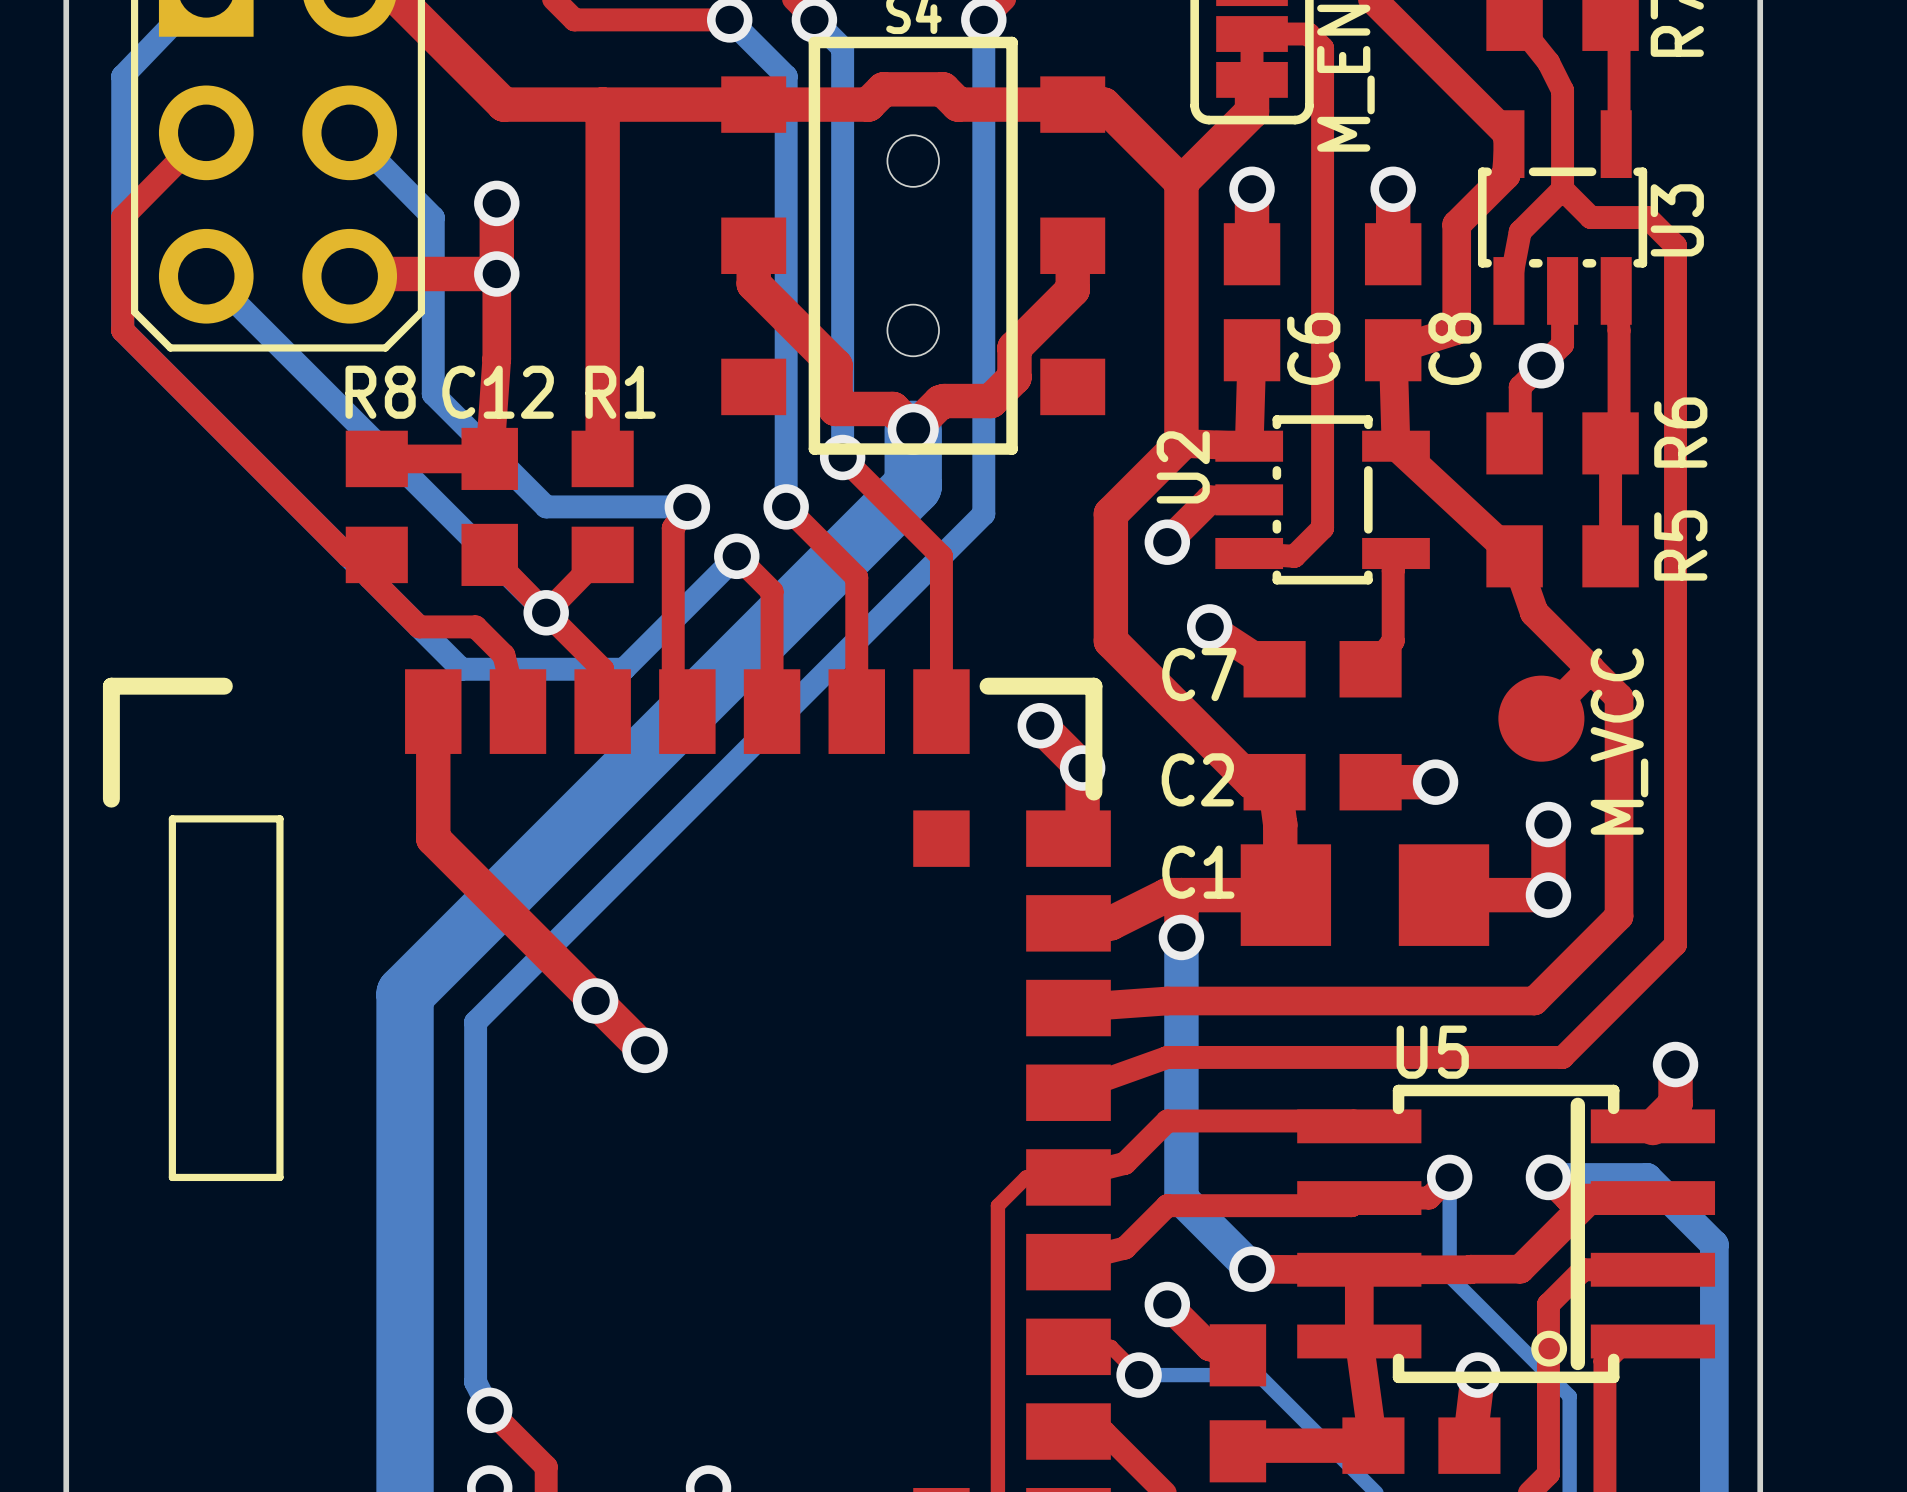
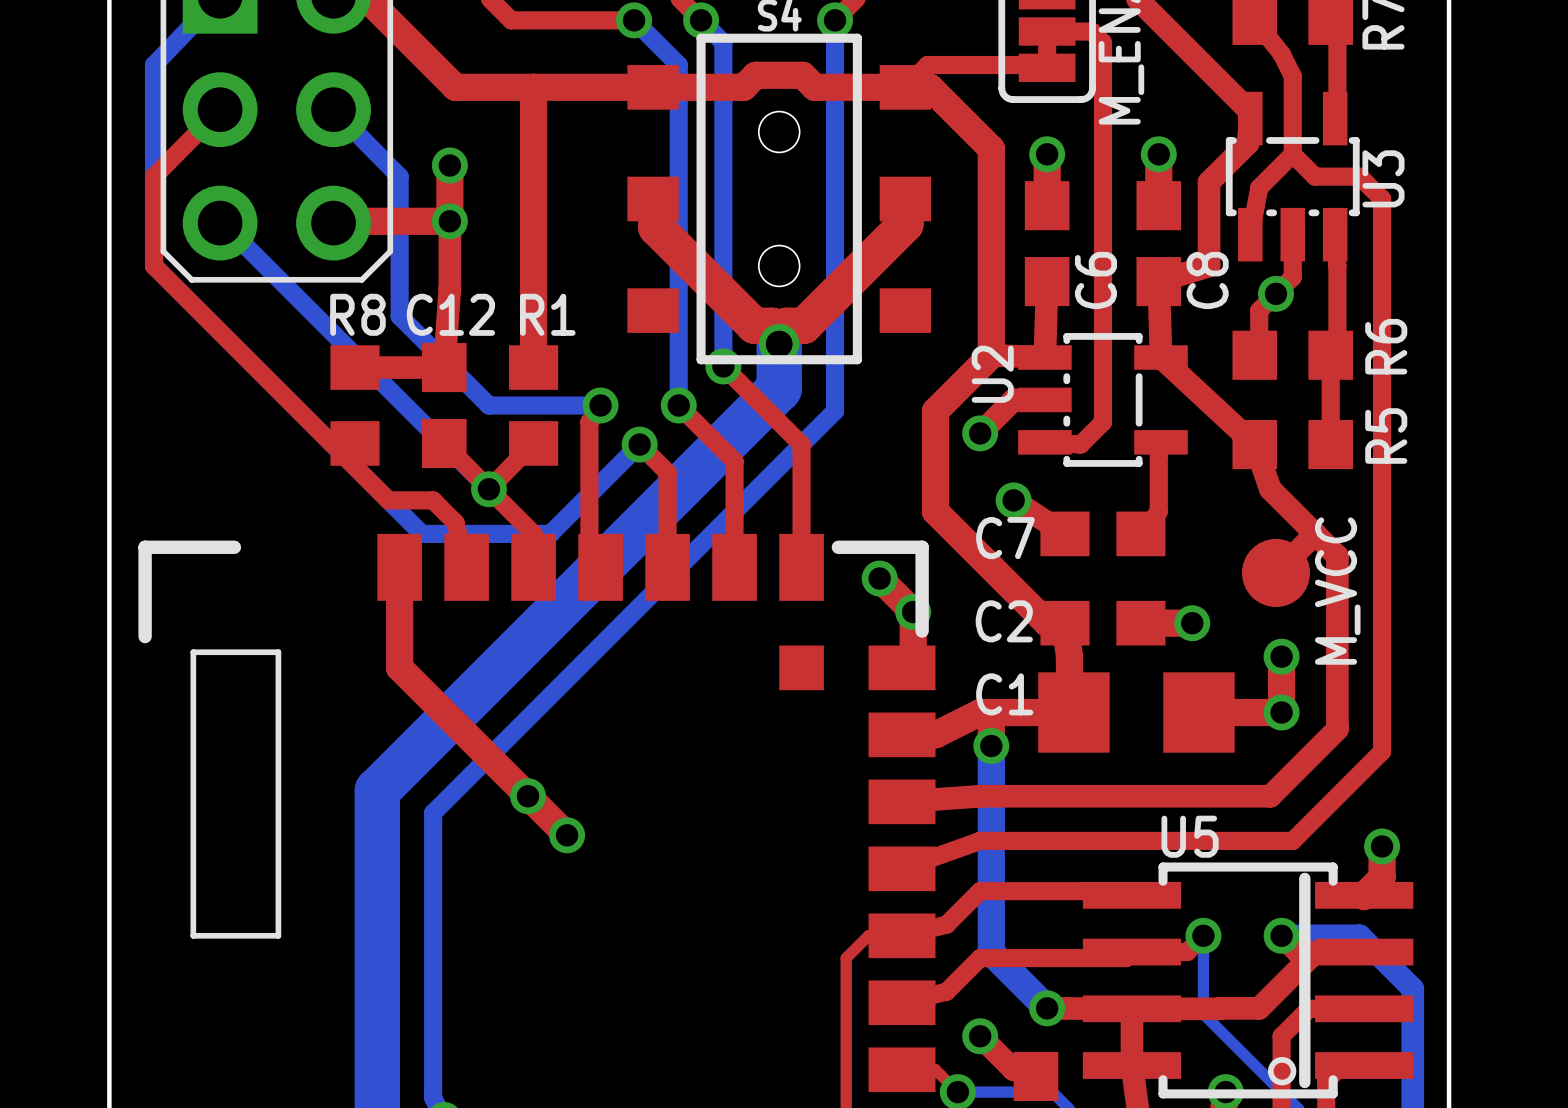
top track: (1252, 79) (1252, 111) (1181, 182) -> (1047, 67) (1024, 65) (927, 65) (905, 87)
top track: (753, 245) (753, 283) (835, 365) (835, 408) (892, 408) (913, 429) (940, 402) (990, 401) (1014, 377) (1014, 348) (1072, 289) (1072, 277) -> (779, 332) (786, 325) (803, 325) (905, 224)
top track: none -> (656, 198) (656, 227) (754, 325) (772, 325) (779, 332)

